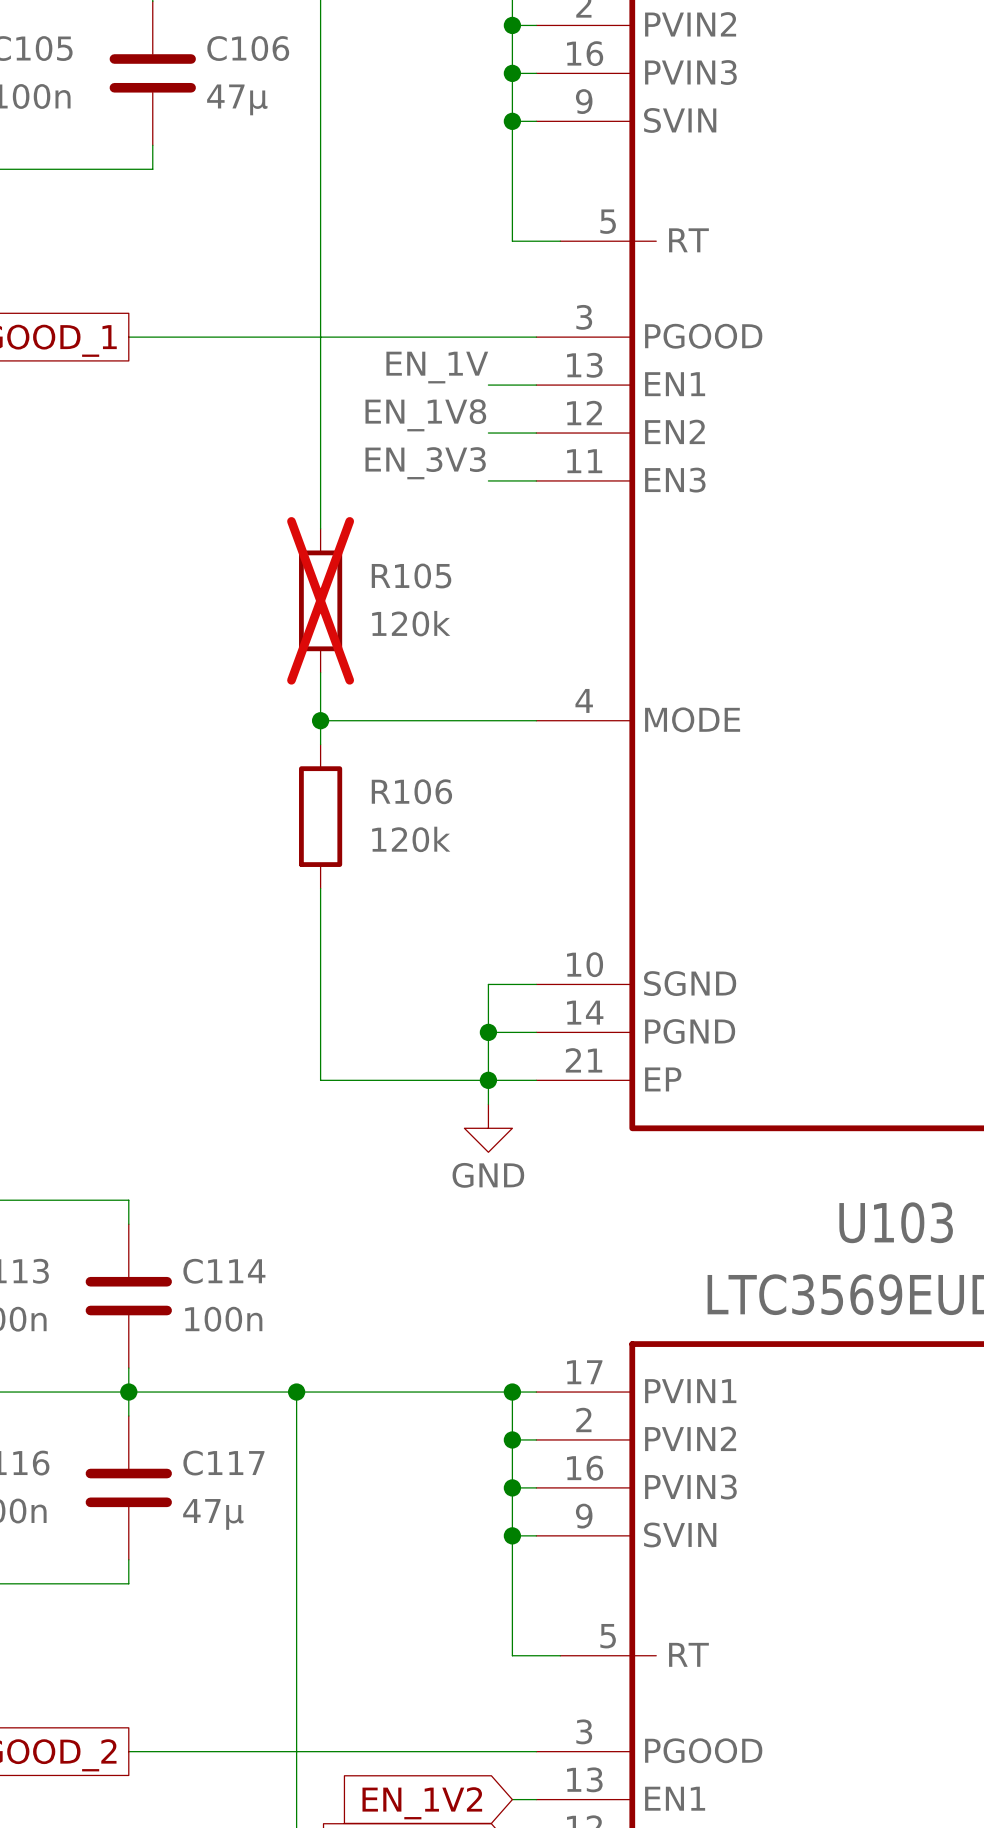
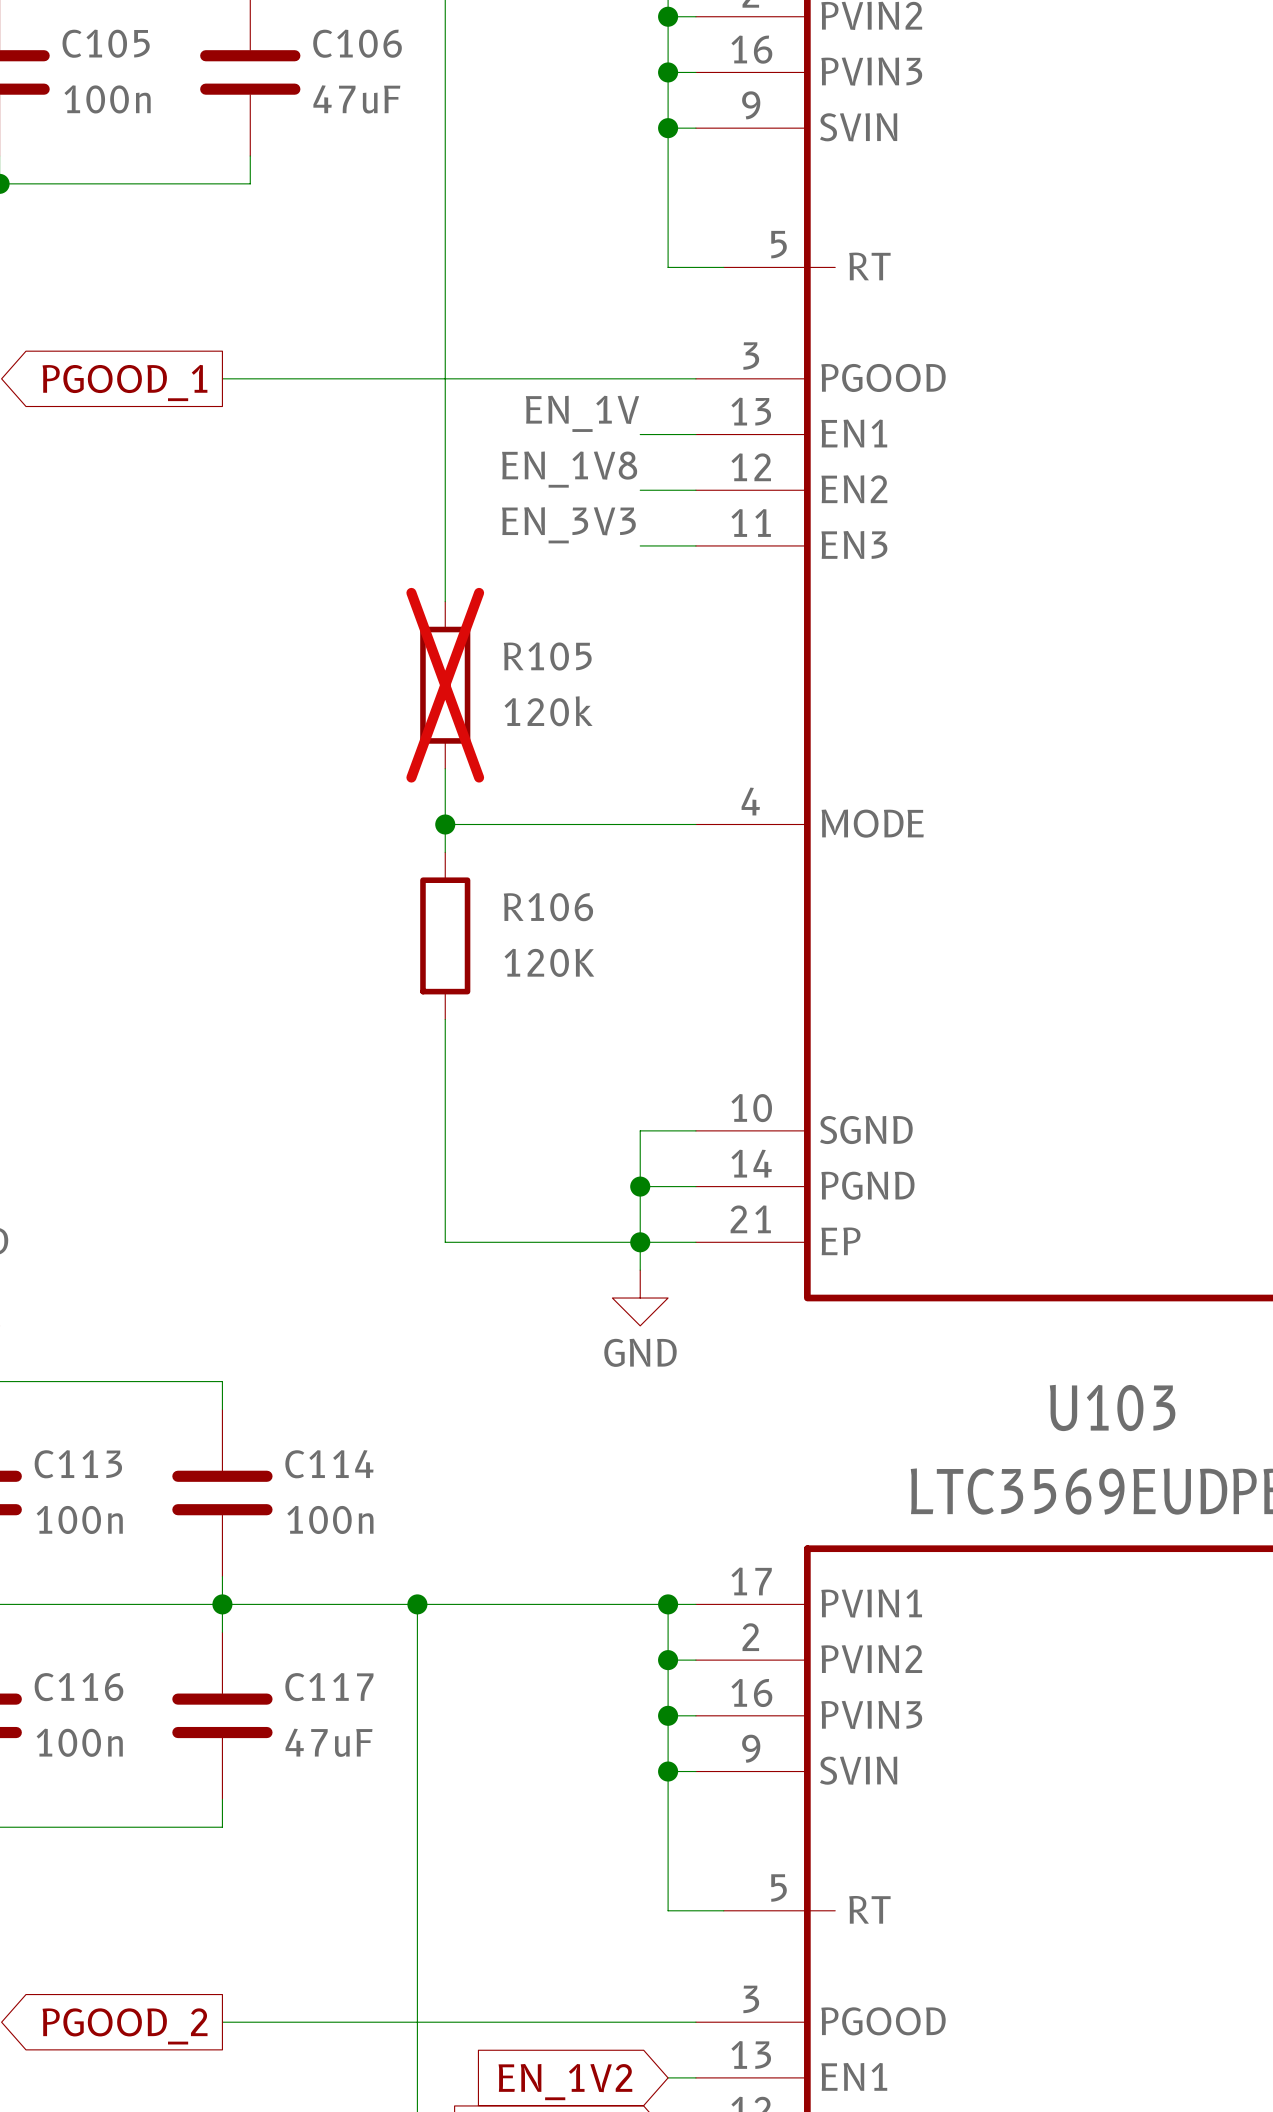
C106 value: 47µ (237, 99) -> 47uF (356, 99)
R106 value: 120k (411, 839) -> 120K (549, 962)
C117 value: 47µ (213, 1514) -> 47uF (329, 1742)

